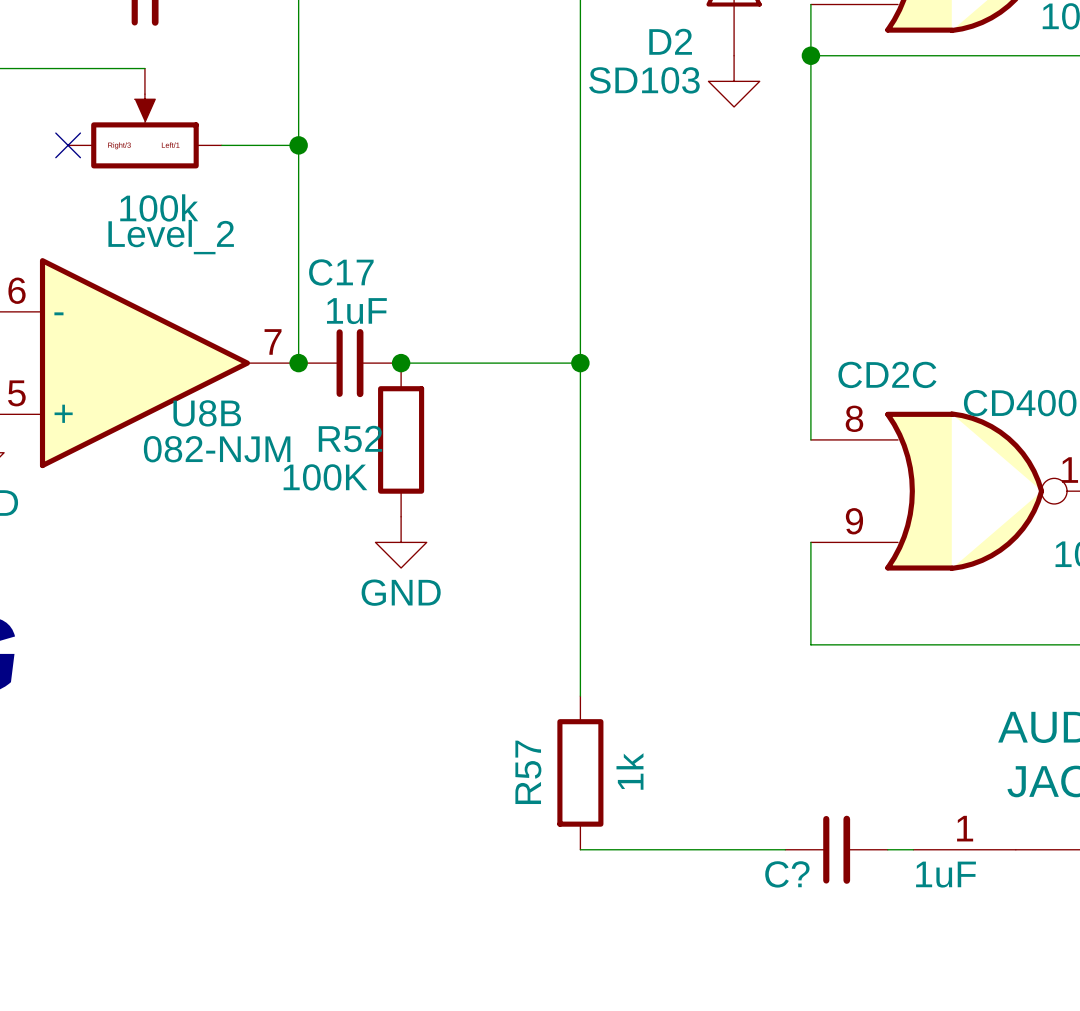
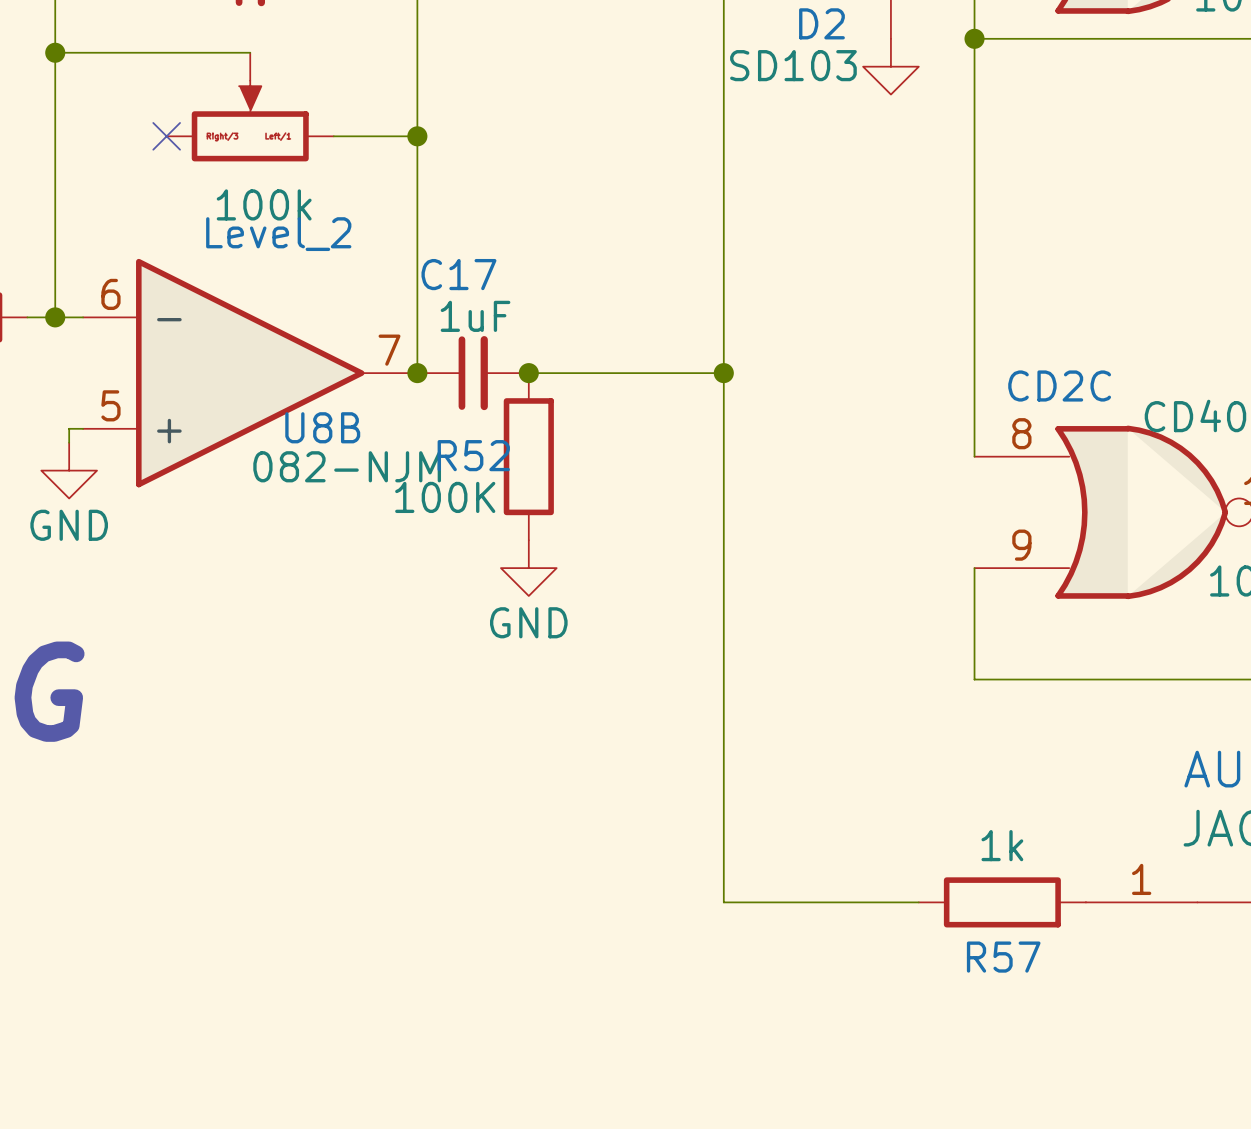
wire: none -> (723, 735) (723, 902)
R57 value position: 1k (629, 771) -> 1k (1002, 845)
R57 name position: R57 (528, 772) -> R57 (1003, 957)
R57 rotation: 0° (580, 772) -> 90° clockwise (1002, 902)
R57 position: (580, 772) -> (1002, 902)
C?: 1uF (836, 849) -> none

